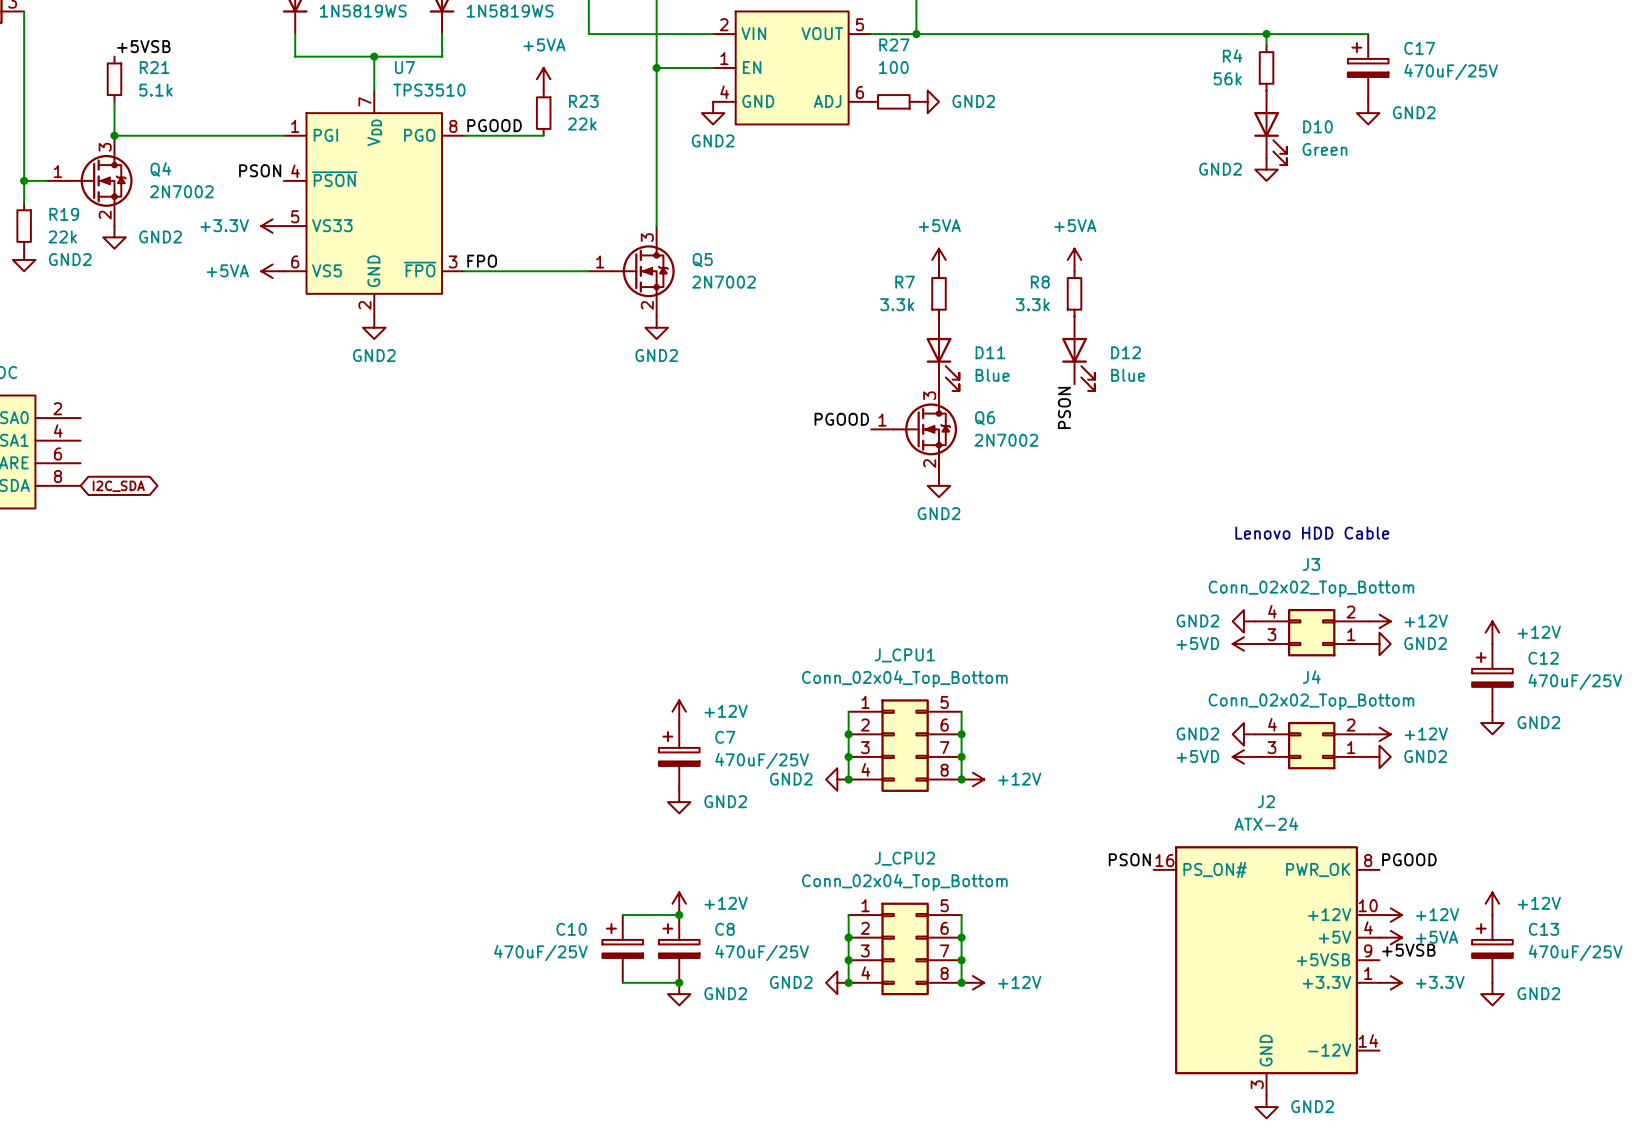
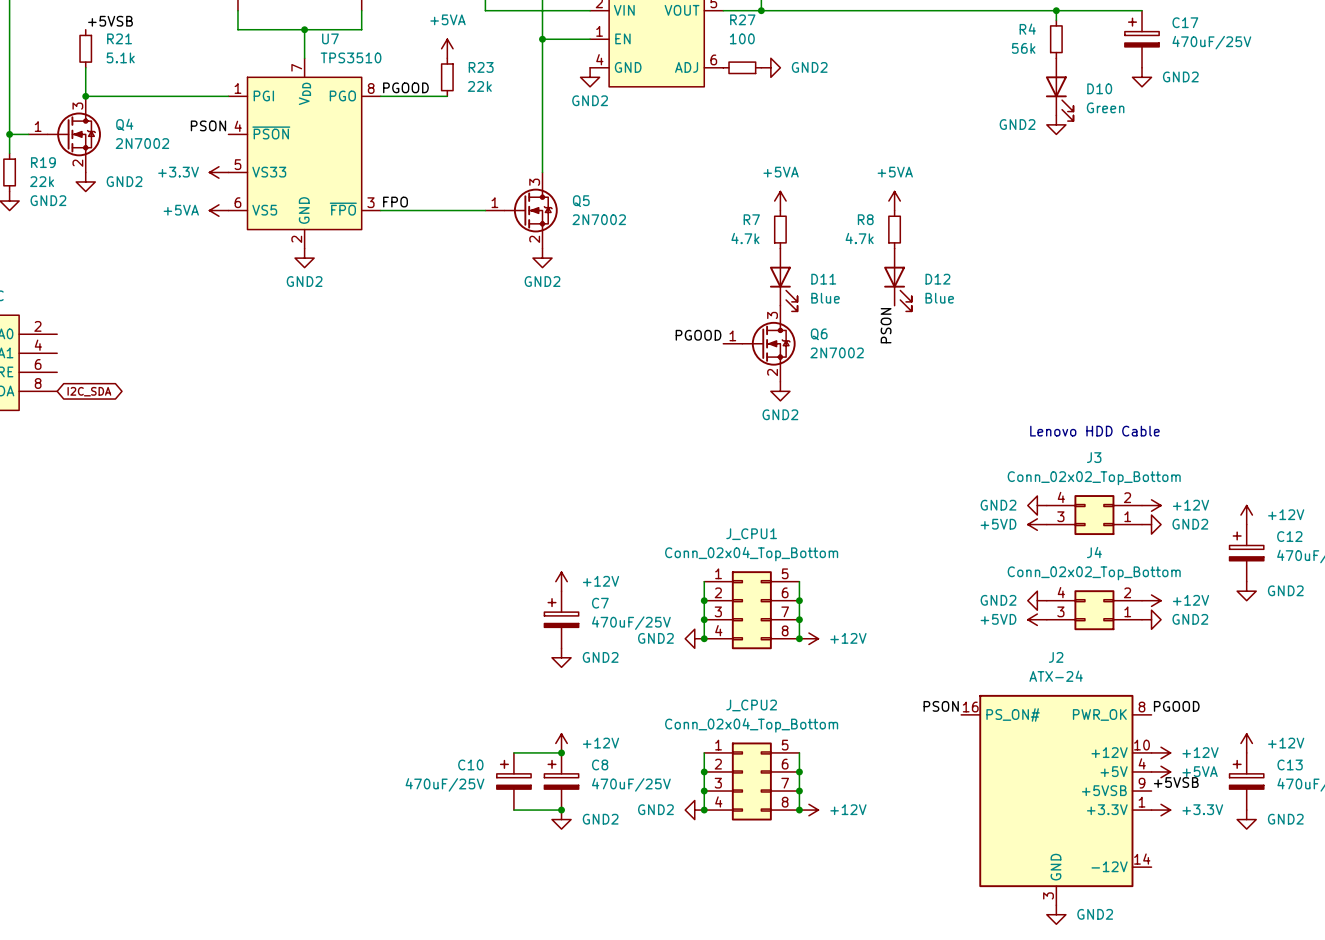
R7 value: 3.3k (897, 304) -> 4.7k (745, 238)
R8 value: 3.3k (1032, 304) -> 4.7k (859, 238)

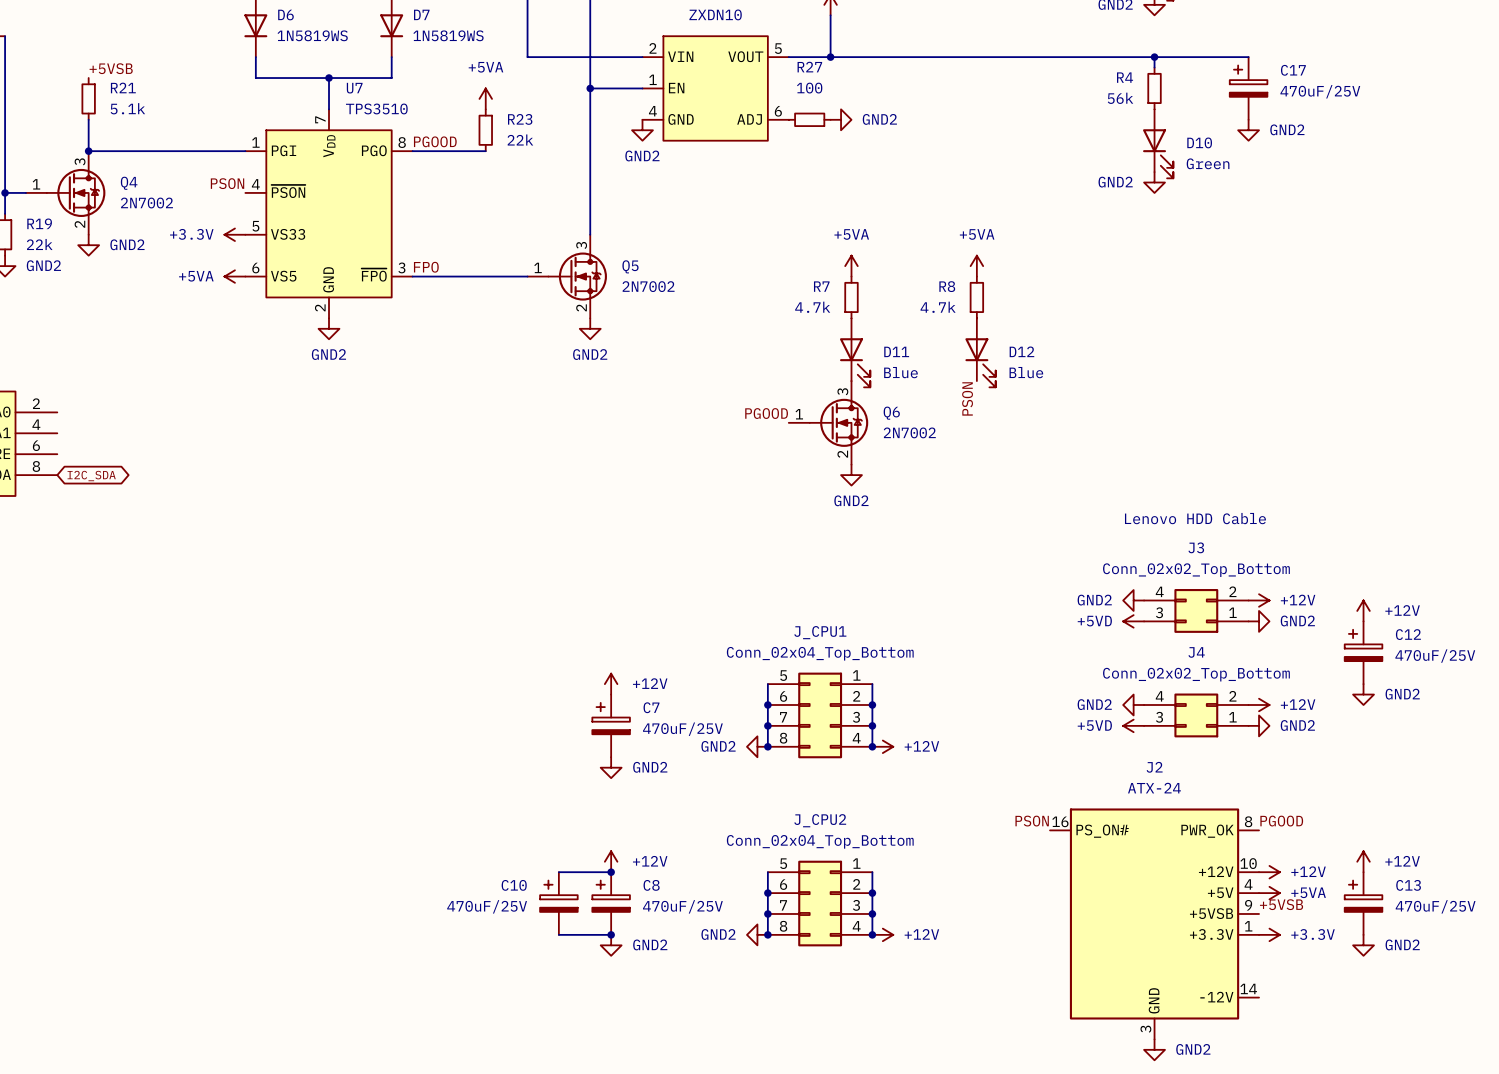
J_CPU1 flip: as is (751, 610) -> left-right (820, 715)
J_CPU2 flip: as is (751, 781) -> left-right (820, 903)

